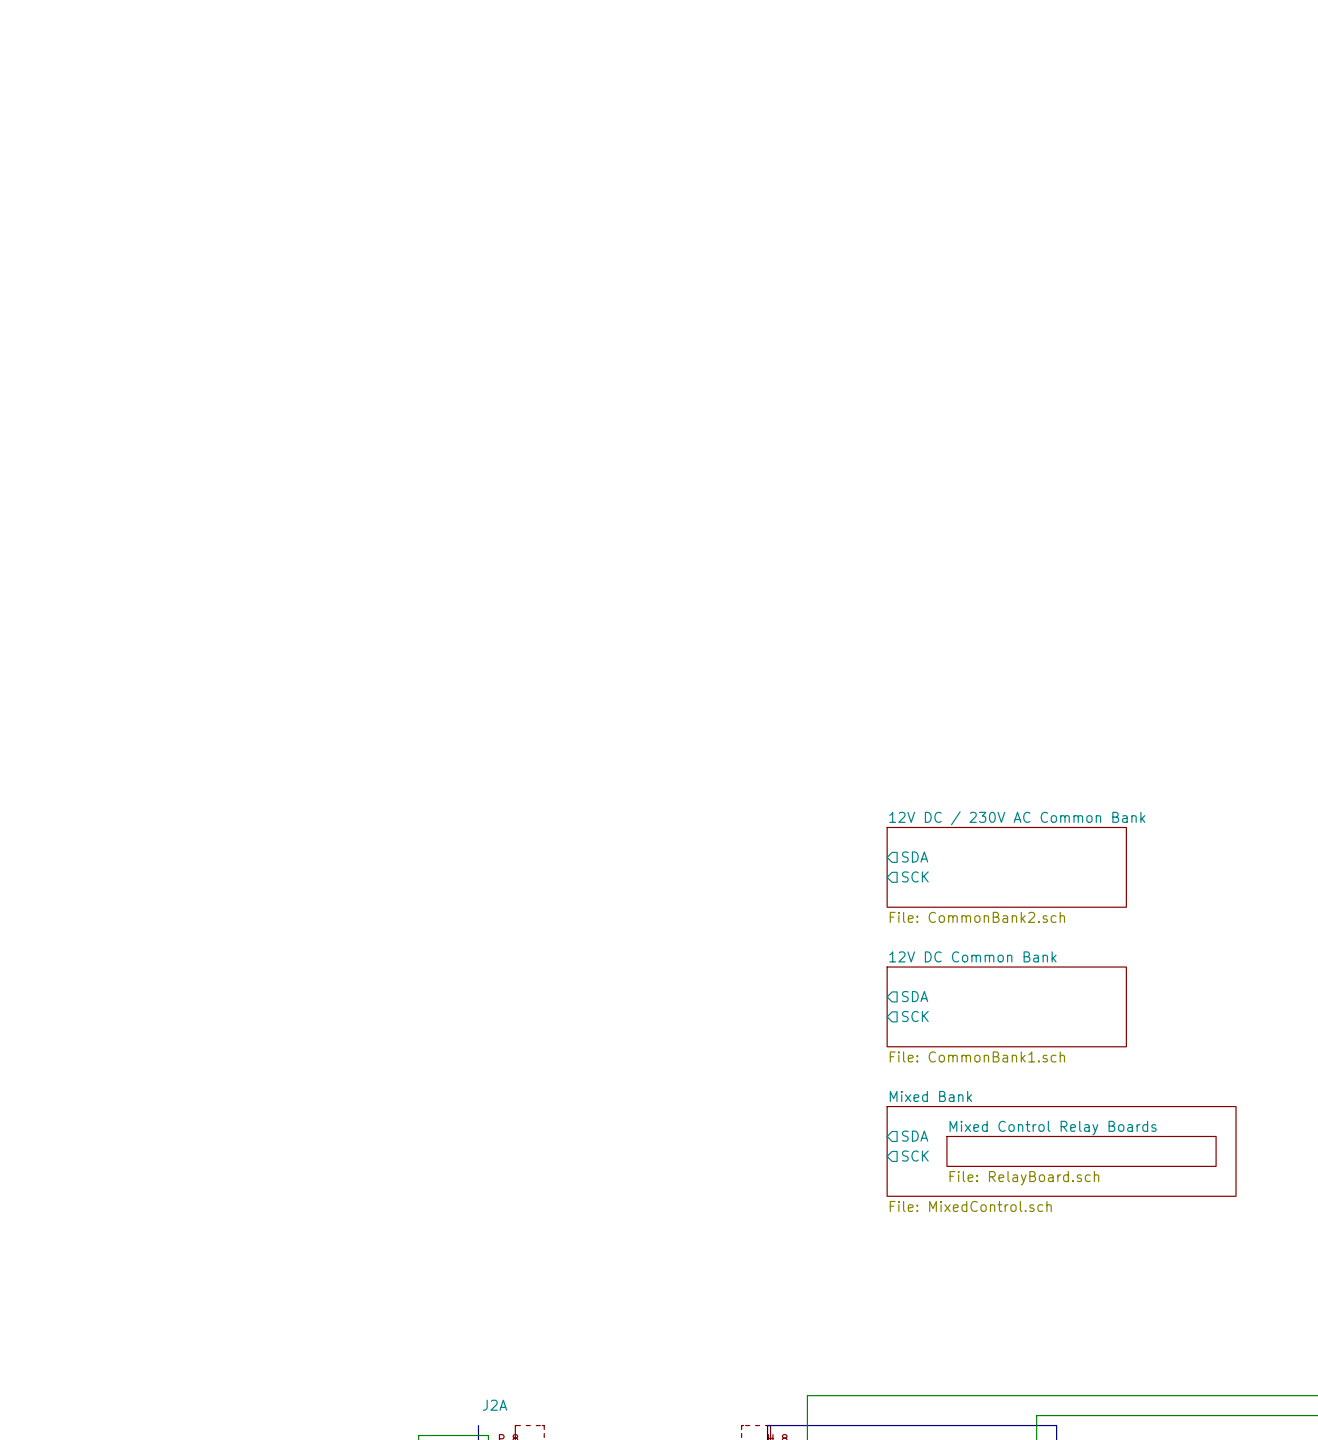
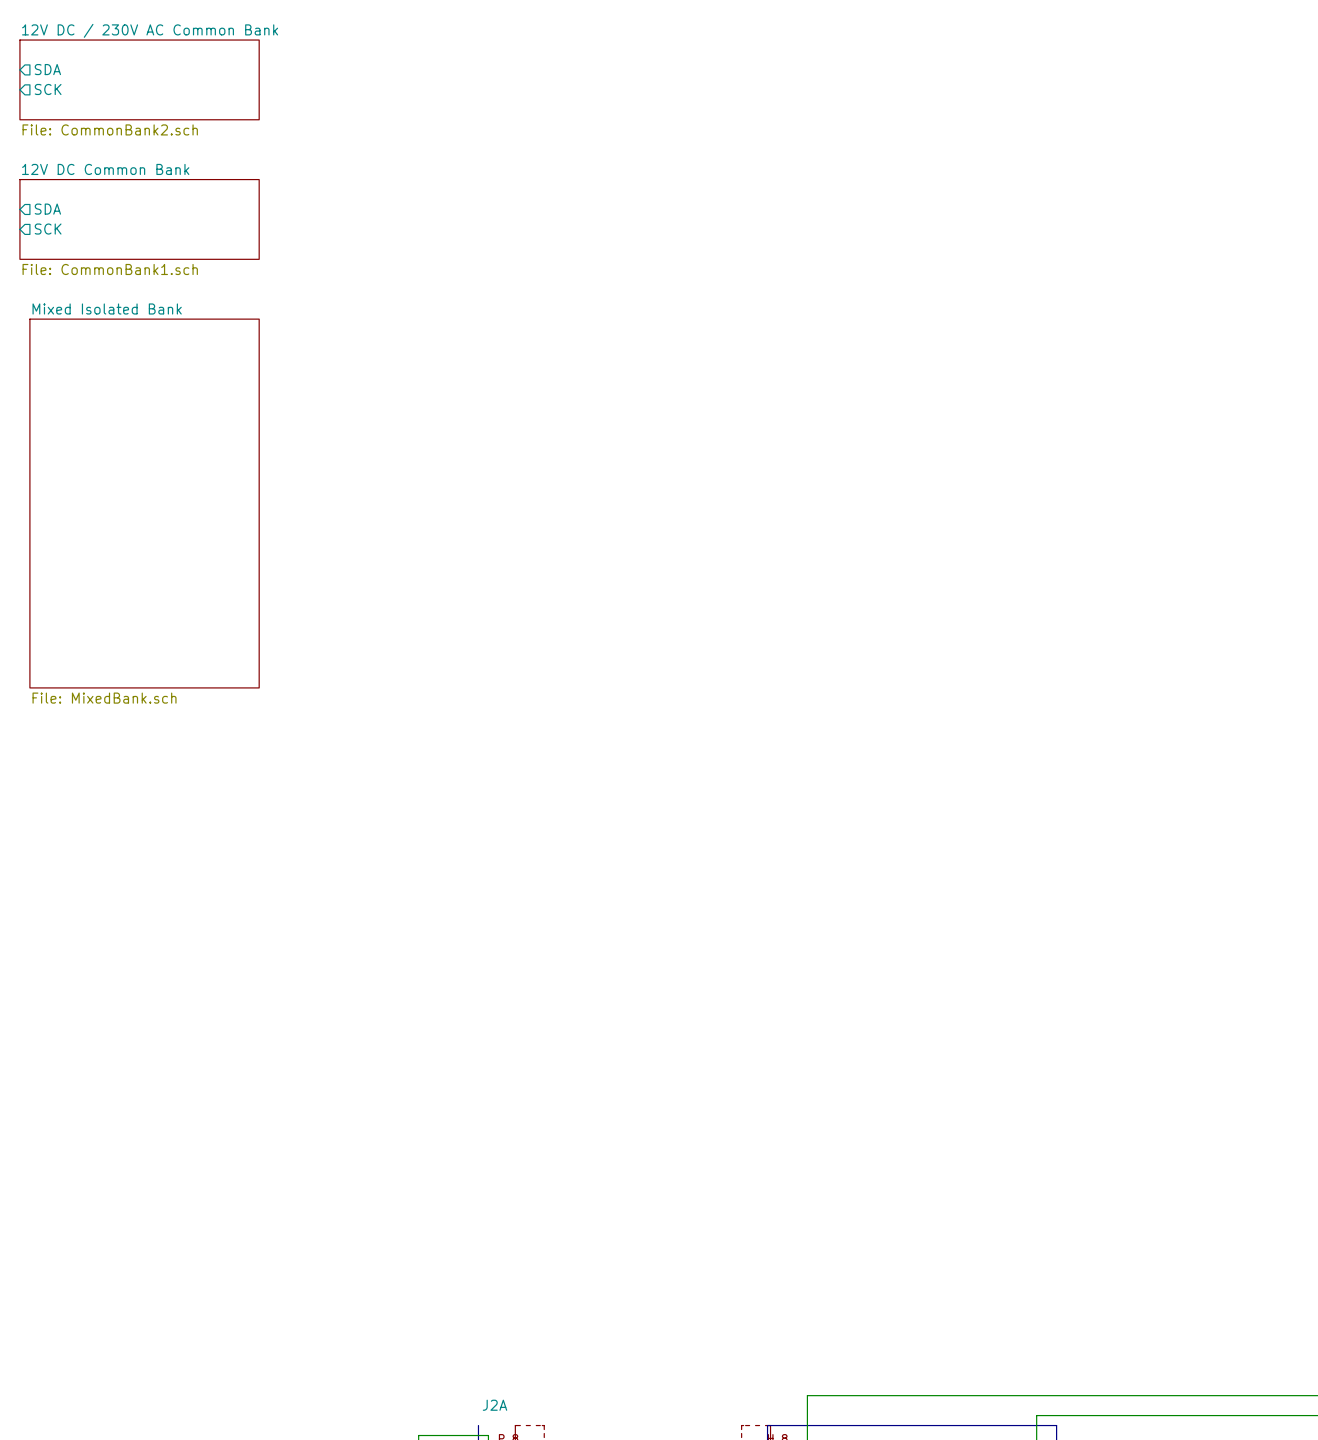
sheet pin: none -> SDA (47, 69)
sheet pin: none -> SCK (48, 89)
sheet pin: none -> SDA (47, 209)
sheet pin: none -> SCK (48, 229)
sheet Mixed Isolated Bank: none -> File: MixedBank.sch (144, 503)
sheet pin: SDA (915, 857) -> none
sheet 12V DC / 230V AC Common Bank position: (1006, 867) -> (139, 79)
sheet pin: SCK (915, 876) -> none
sheet pin: SDA (915, 996) -> none
sheet 12V DC Common Bank position: (1006, 1006) -> (139, 219)
sheet pin: SCK (915, 1016) -> none
sheet pin: SDA (915, 1136) -> none
sheet Mixed Bank: File: MixedControl.sch (1061, 1151) -> none
sheet Mixed Control Relay Boards: File: RelayBoard.sch (1081, 1151) -> none
sheet pin: SCK (915, 1156) -> none

